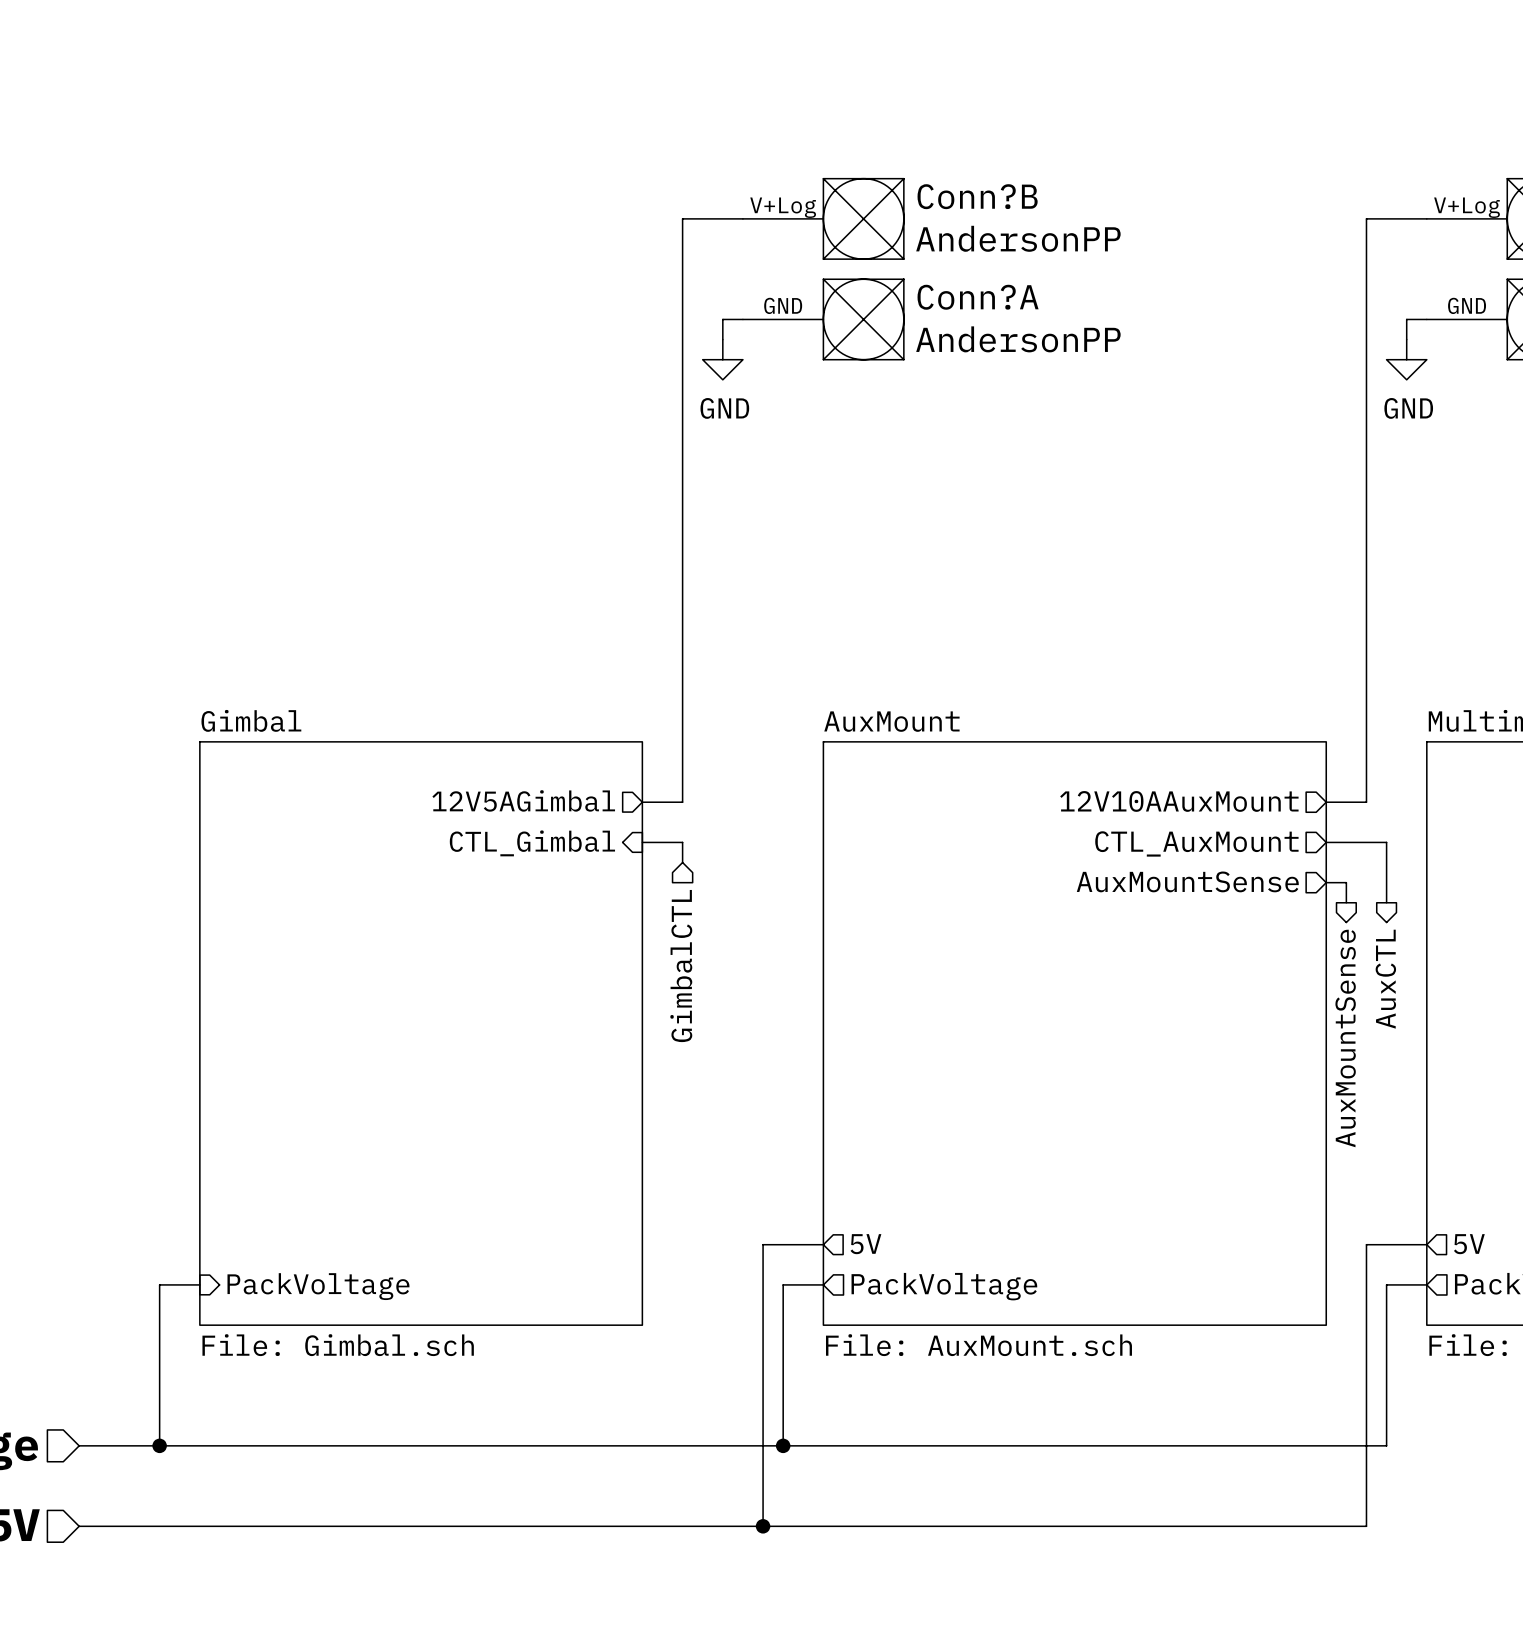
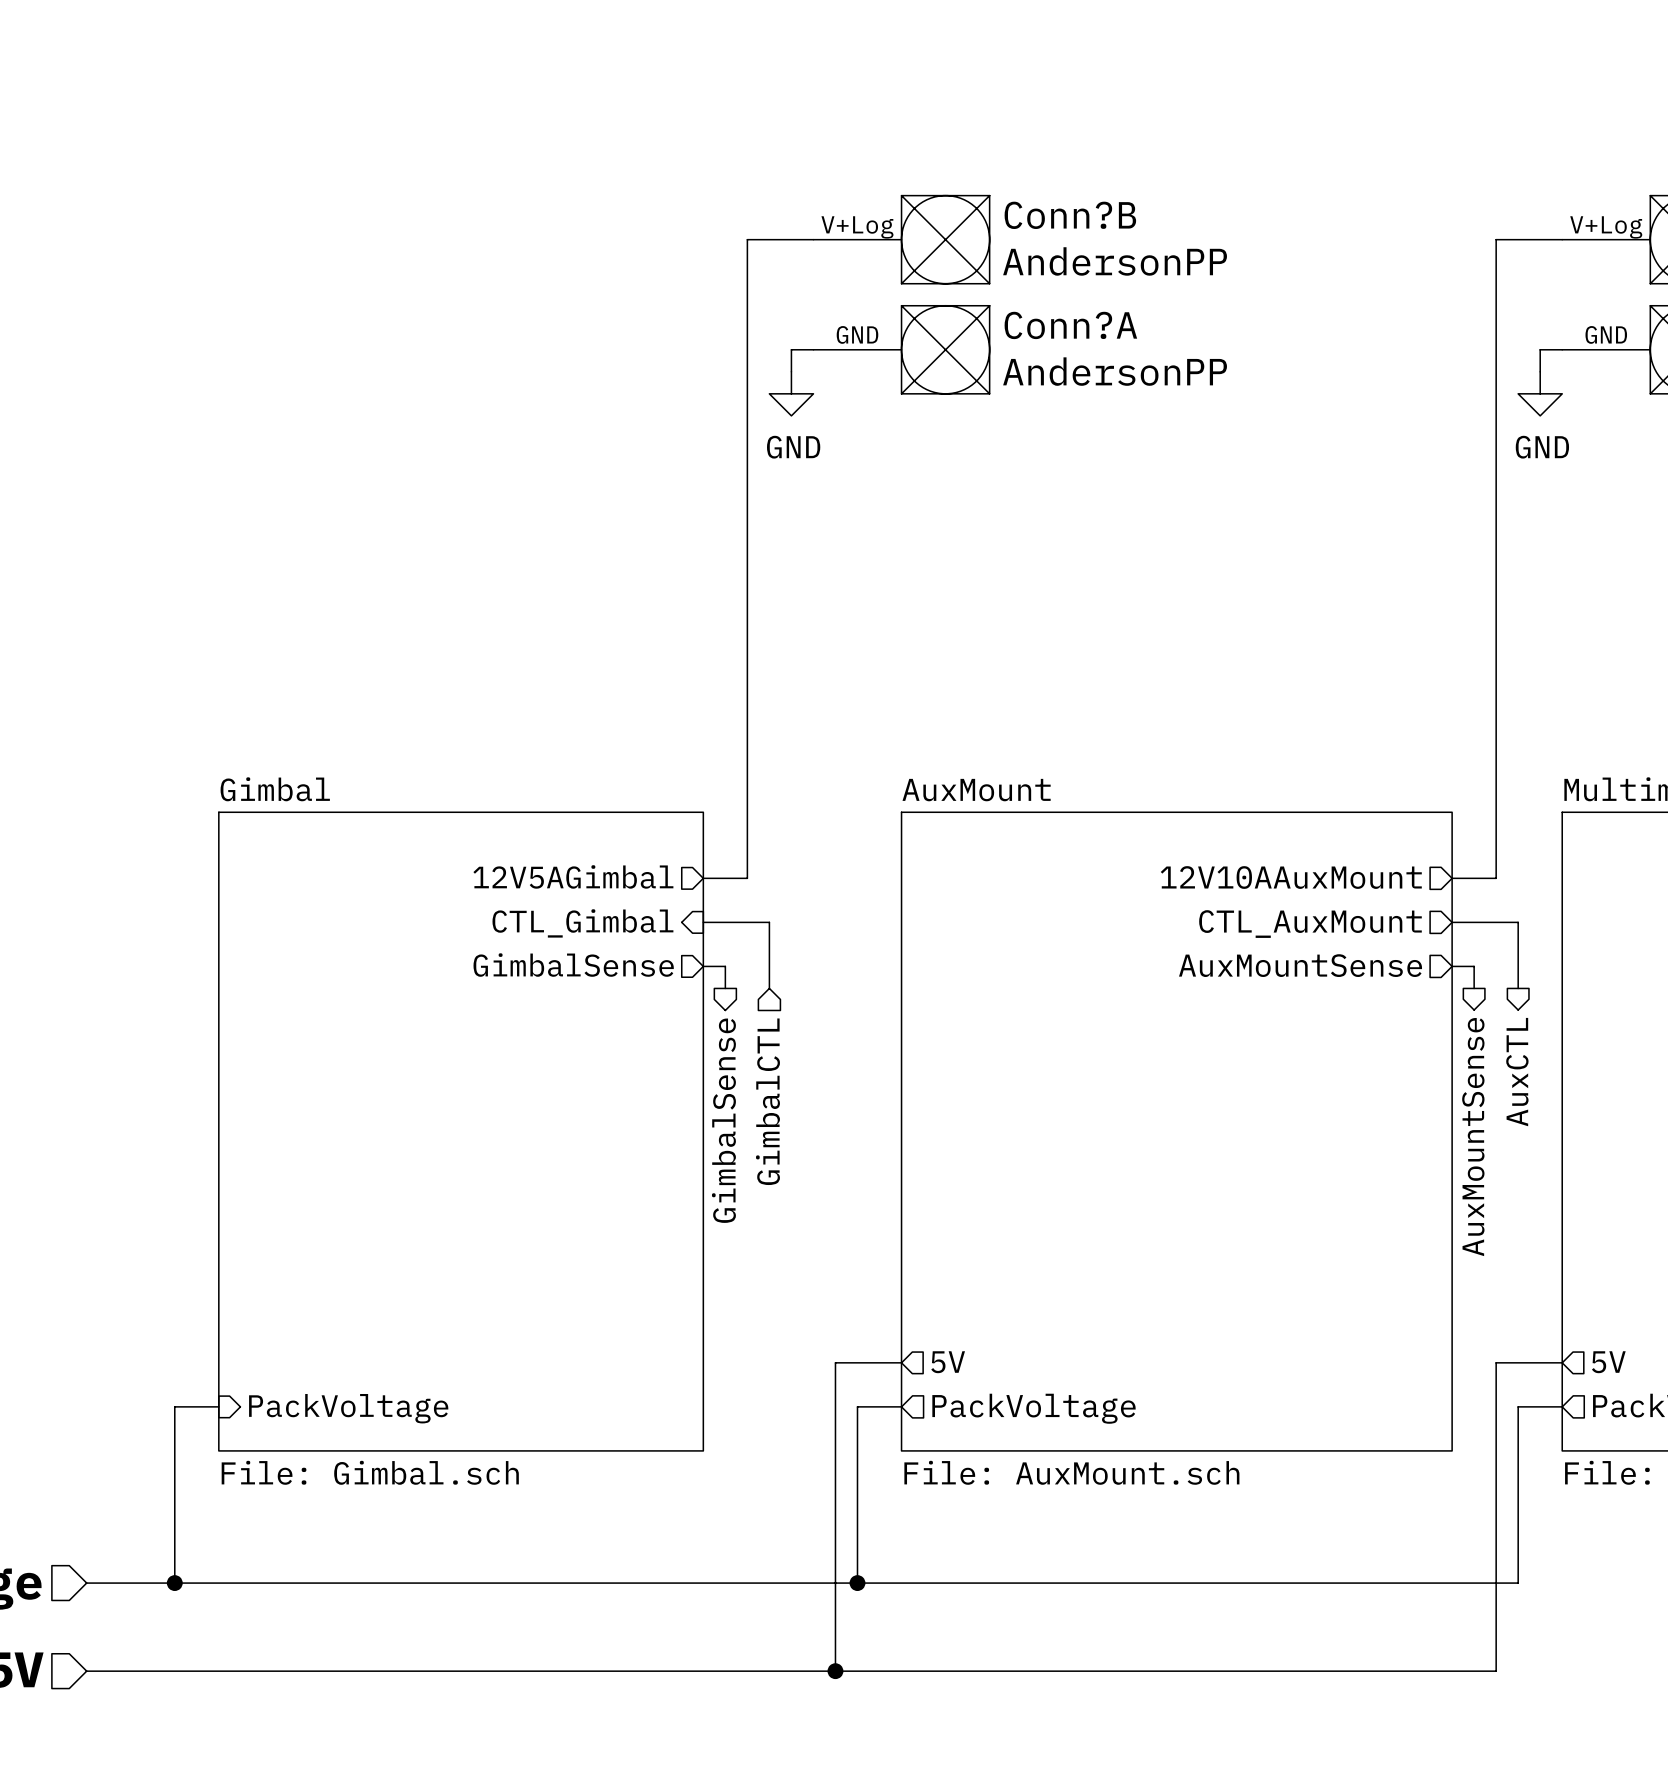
wire: (682, 842) (682, 862) -> (747, 922) (769, 922) (769, 988)
sheet pin: none -> GimbalSense (573, 965)
wire: none -> (703, 966) (725, 966) (725, 988)
hierarchical label position: GimbalCTL (681, 966) -> GimbalCTL (767, 1101)
hierarchical label: none -> GimbalSense (723, 1120)

